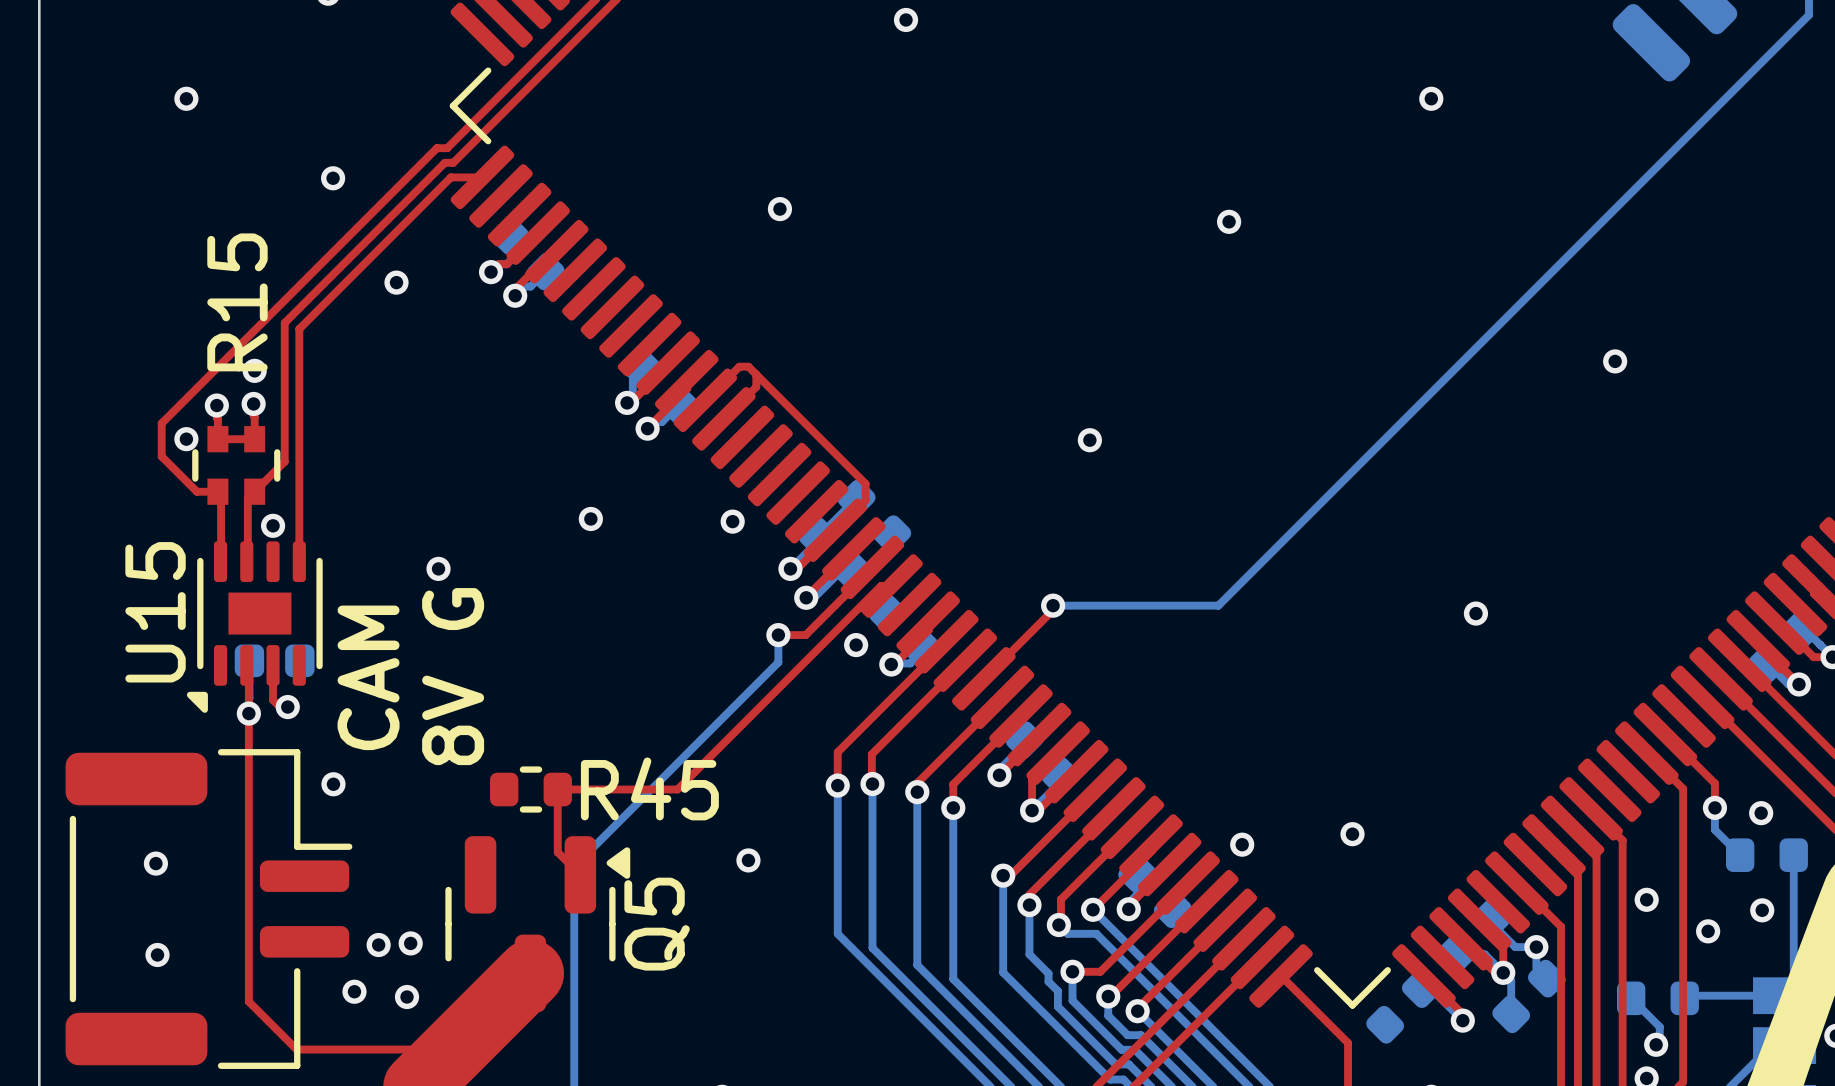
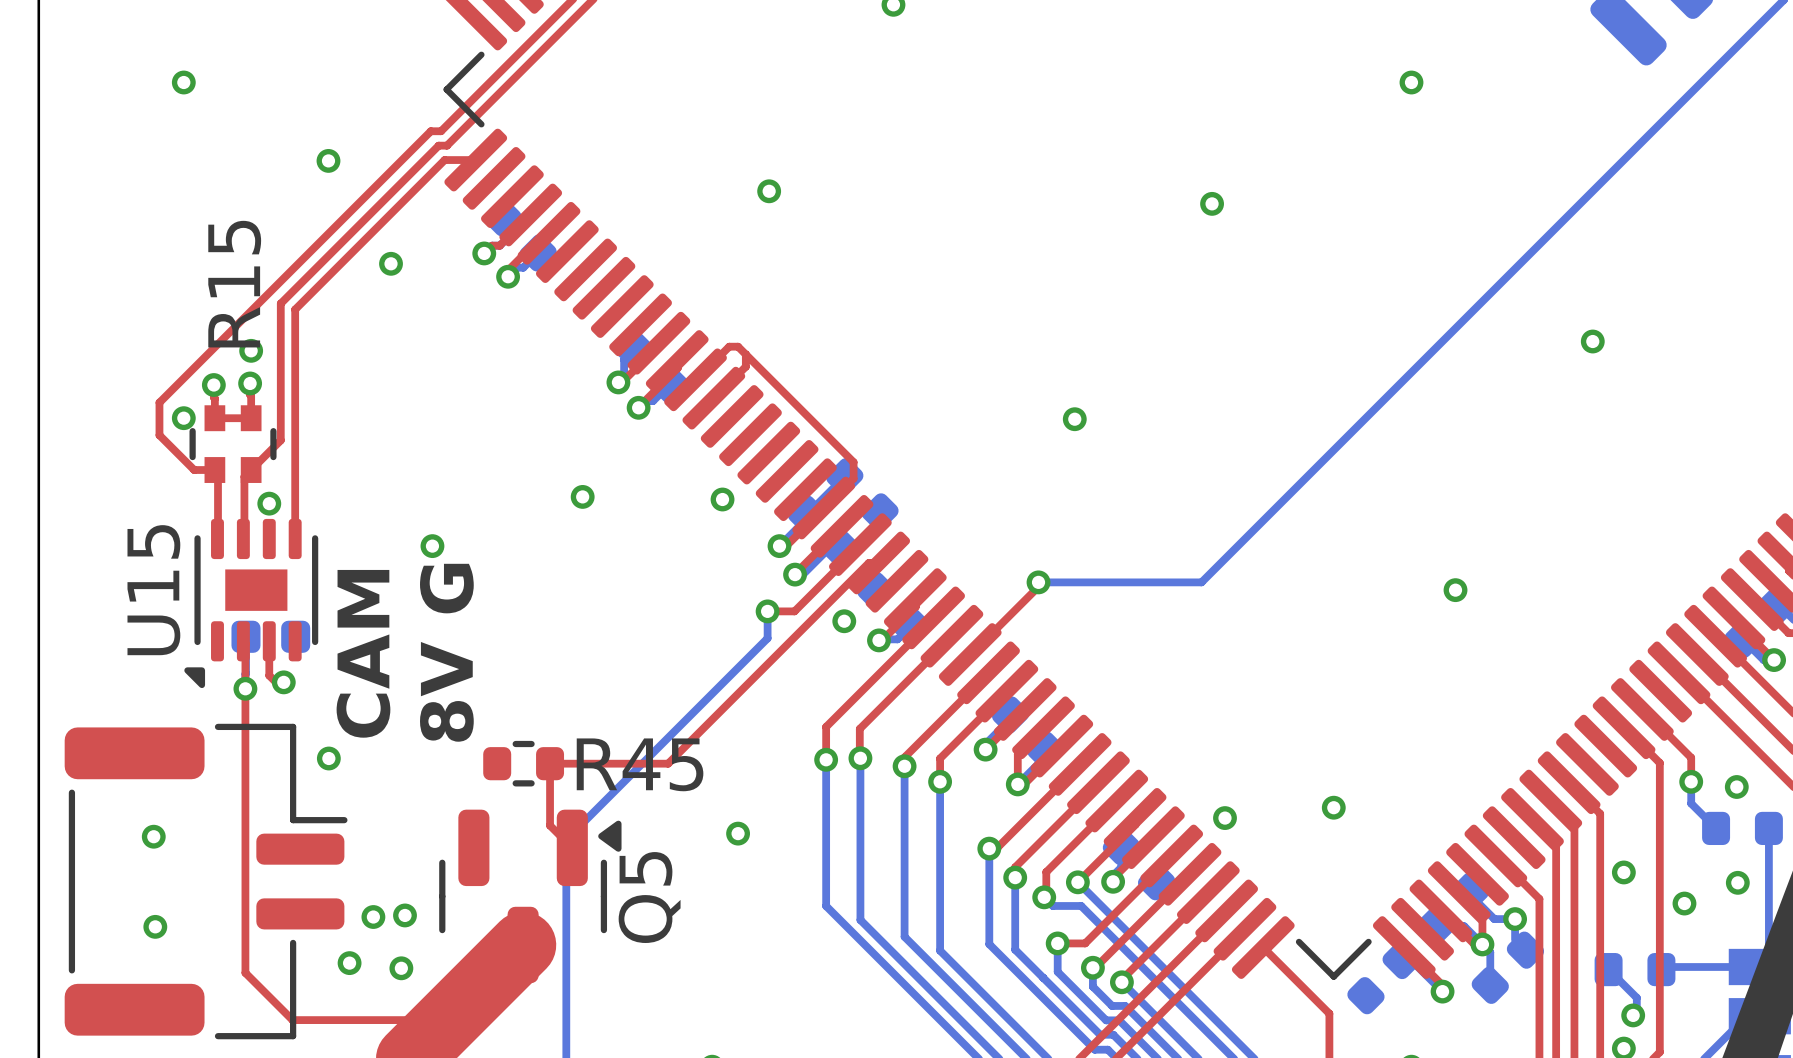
bottom track: (1029, 954) (1048, 973) (1048, 981) (1057, 991) (1057, 1006) -> (1015, 926) (1015, 949) (1043, 977)

